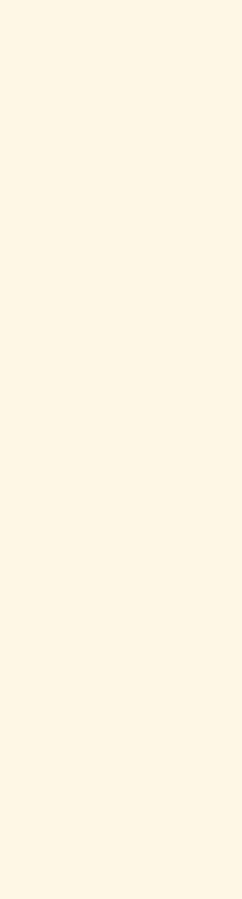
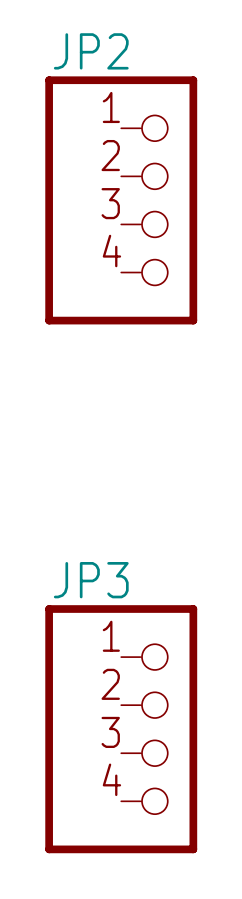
JP2: none -> (121, 200)
JP3: none -> (121, 729)

